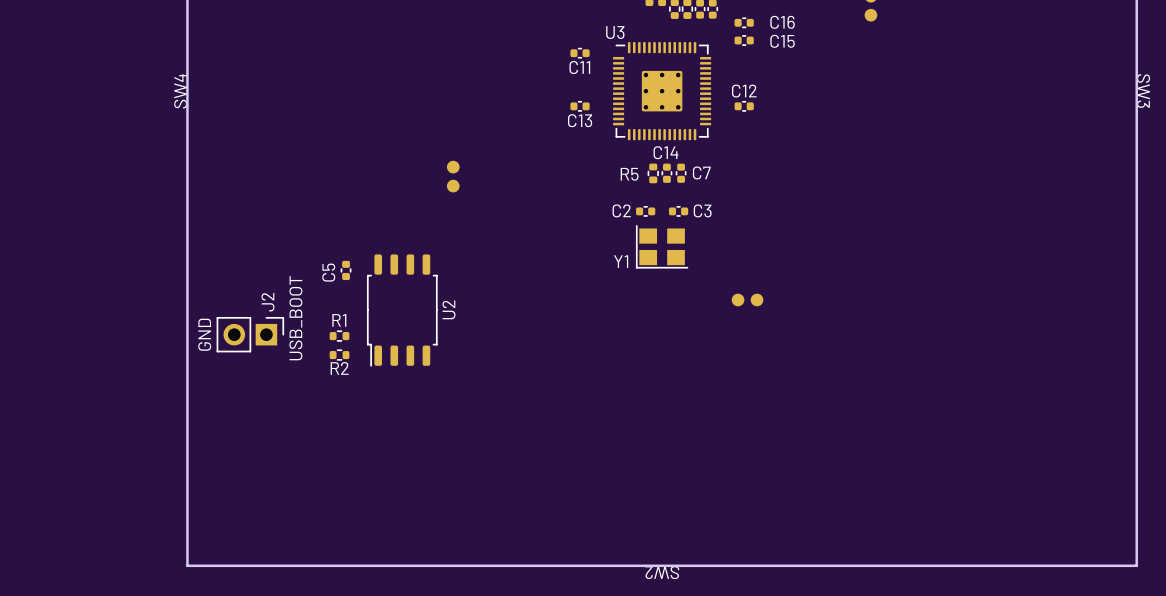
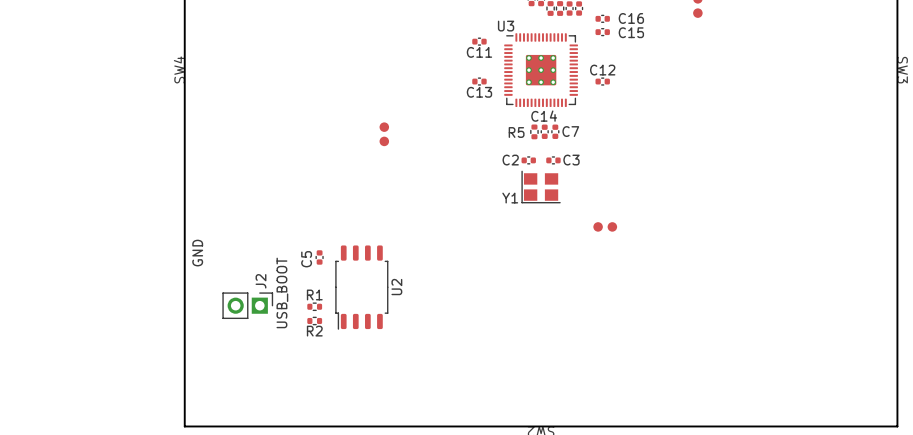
C5 position: (346, 270) -> (319, 257)
U2 position: (402, 310) -> (361, 287)
text position: USB_BOOT (295, 318) -> USB_BOOT (282, 292)
J2 position: (250, 334) -> (247, 305)
R1 position: (339, 336) -> (314, 306)
R2 position: (339, 355) -> (314, 321)

